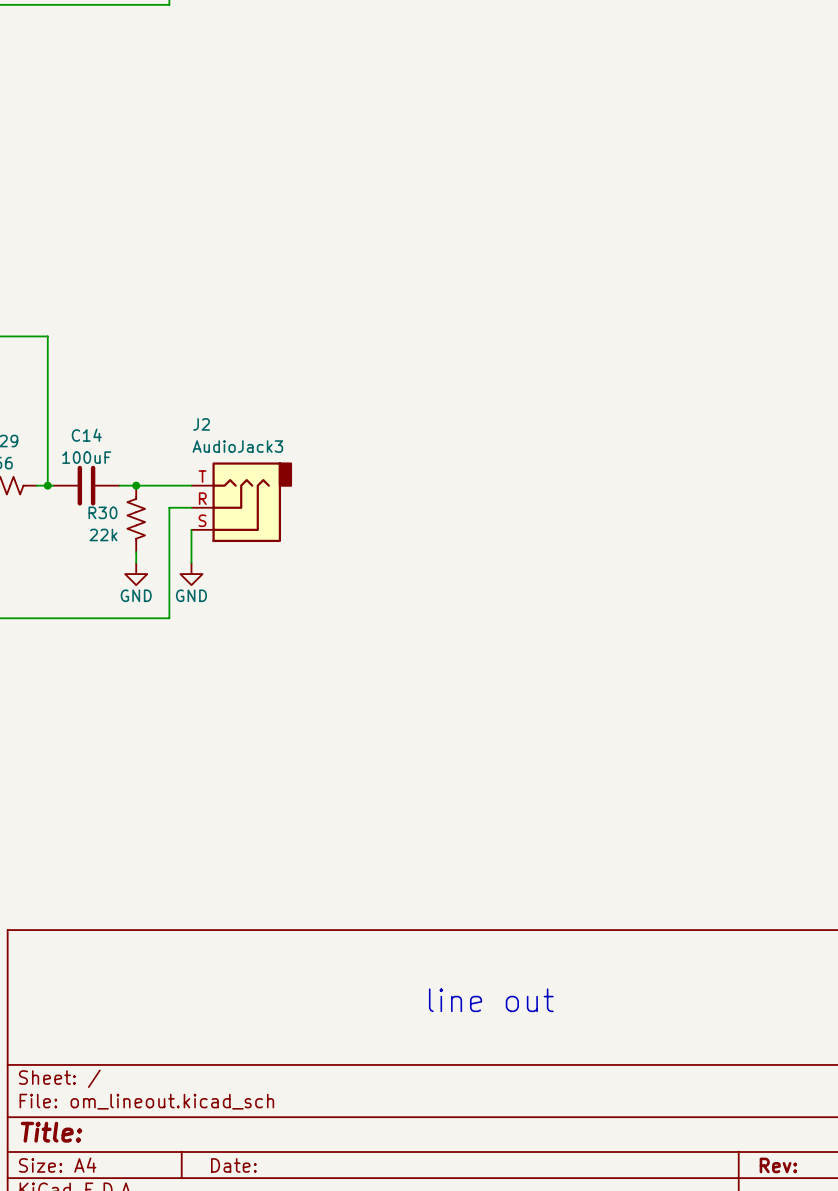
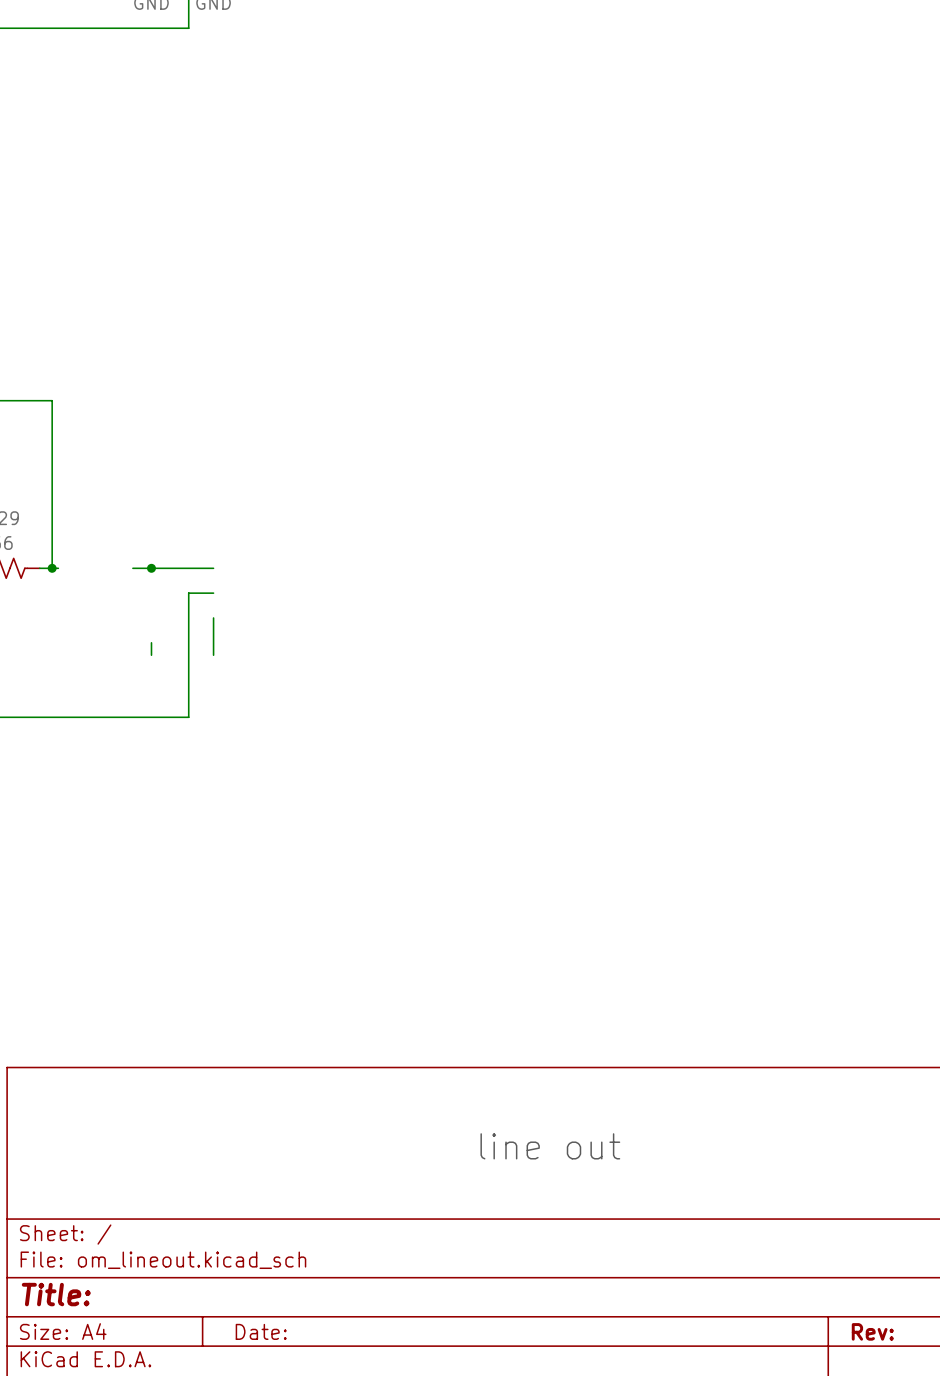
C14: 100uF (86, 485) -> none
J2: AudioJack3 (241, 502) -> none
R30: 22k (136, 518) -> none
power symbol: GND (136, 574) -> none
power symbol: GND (191, 574) -> none

